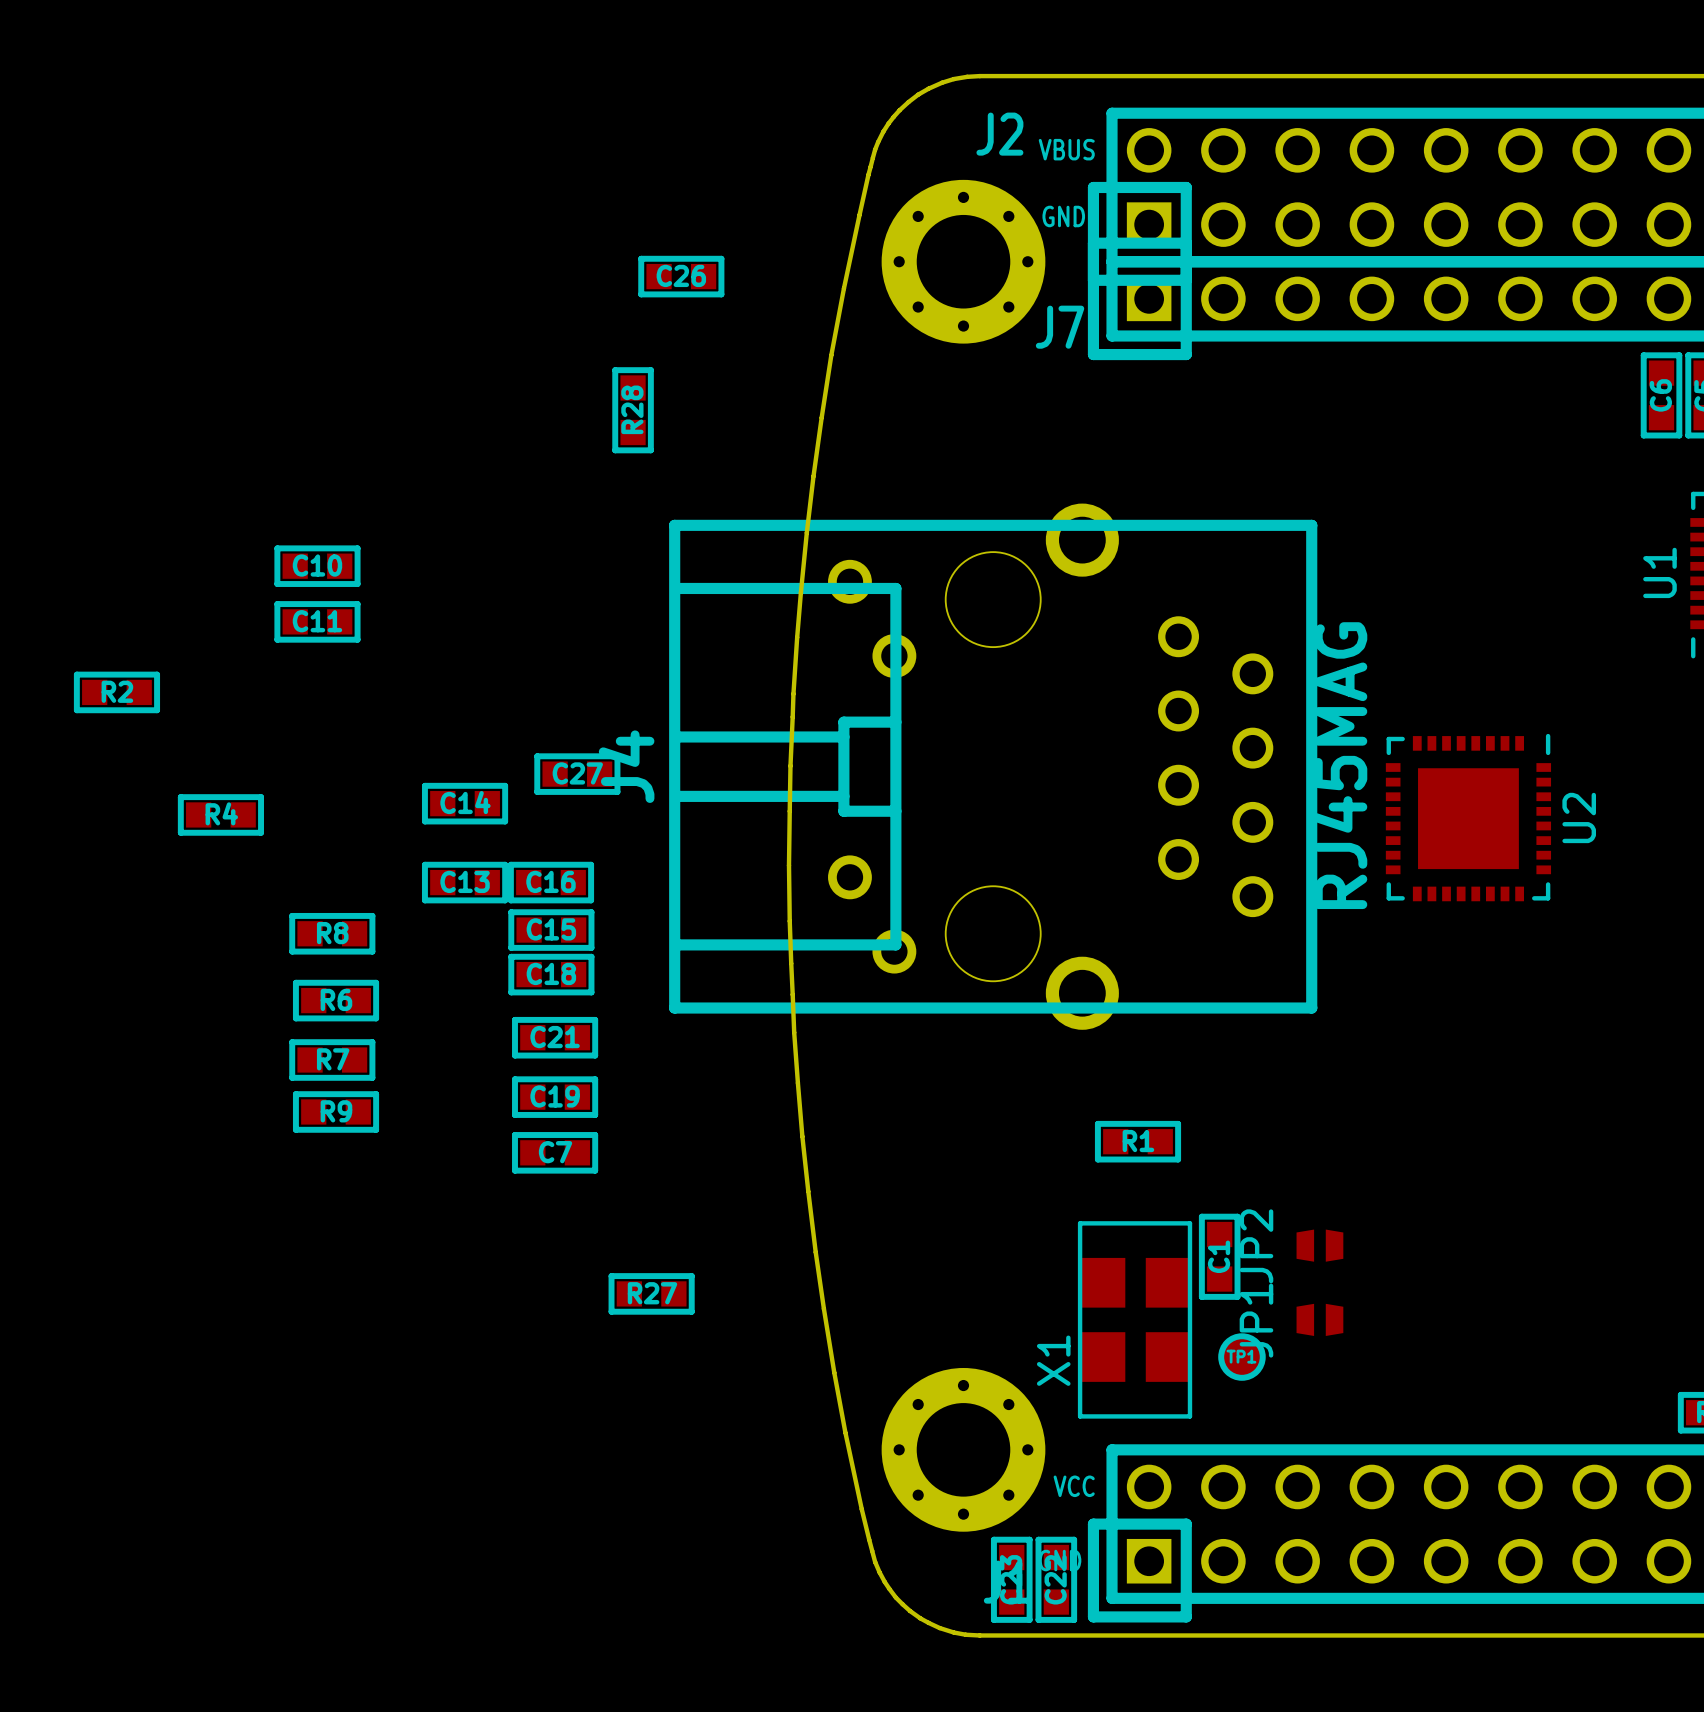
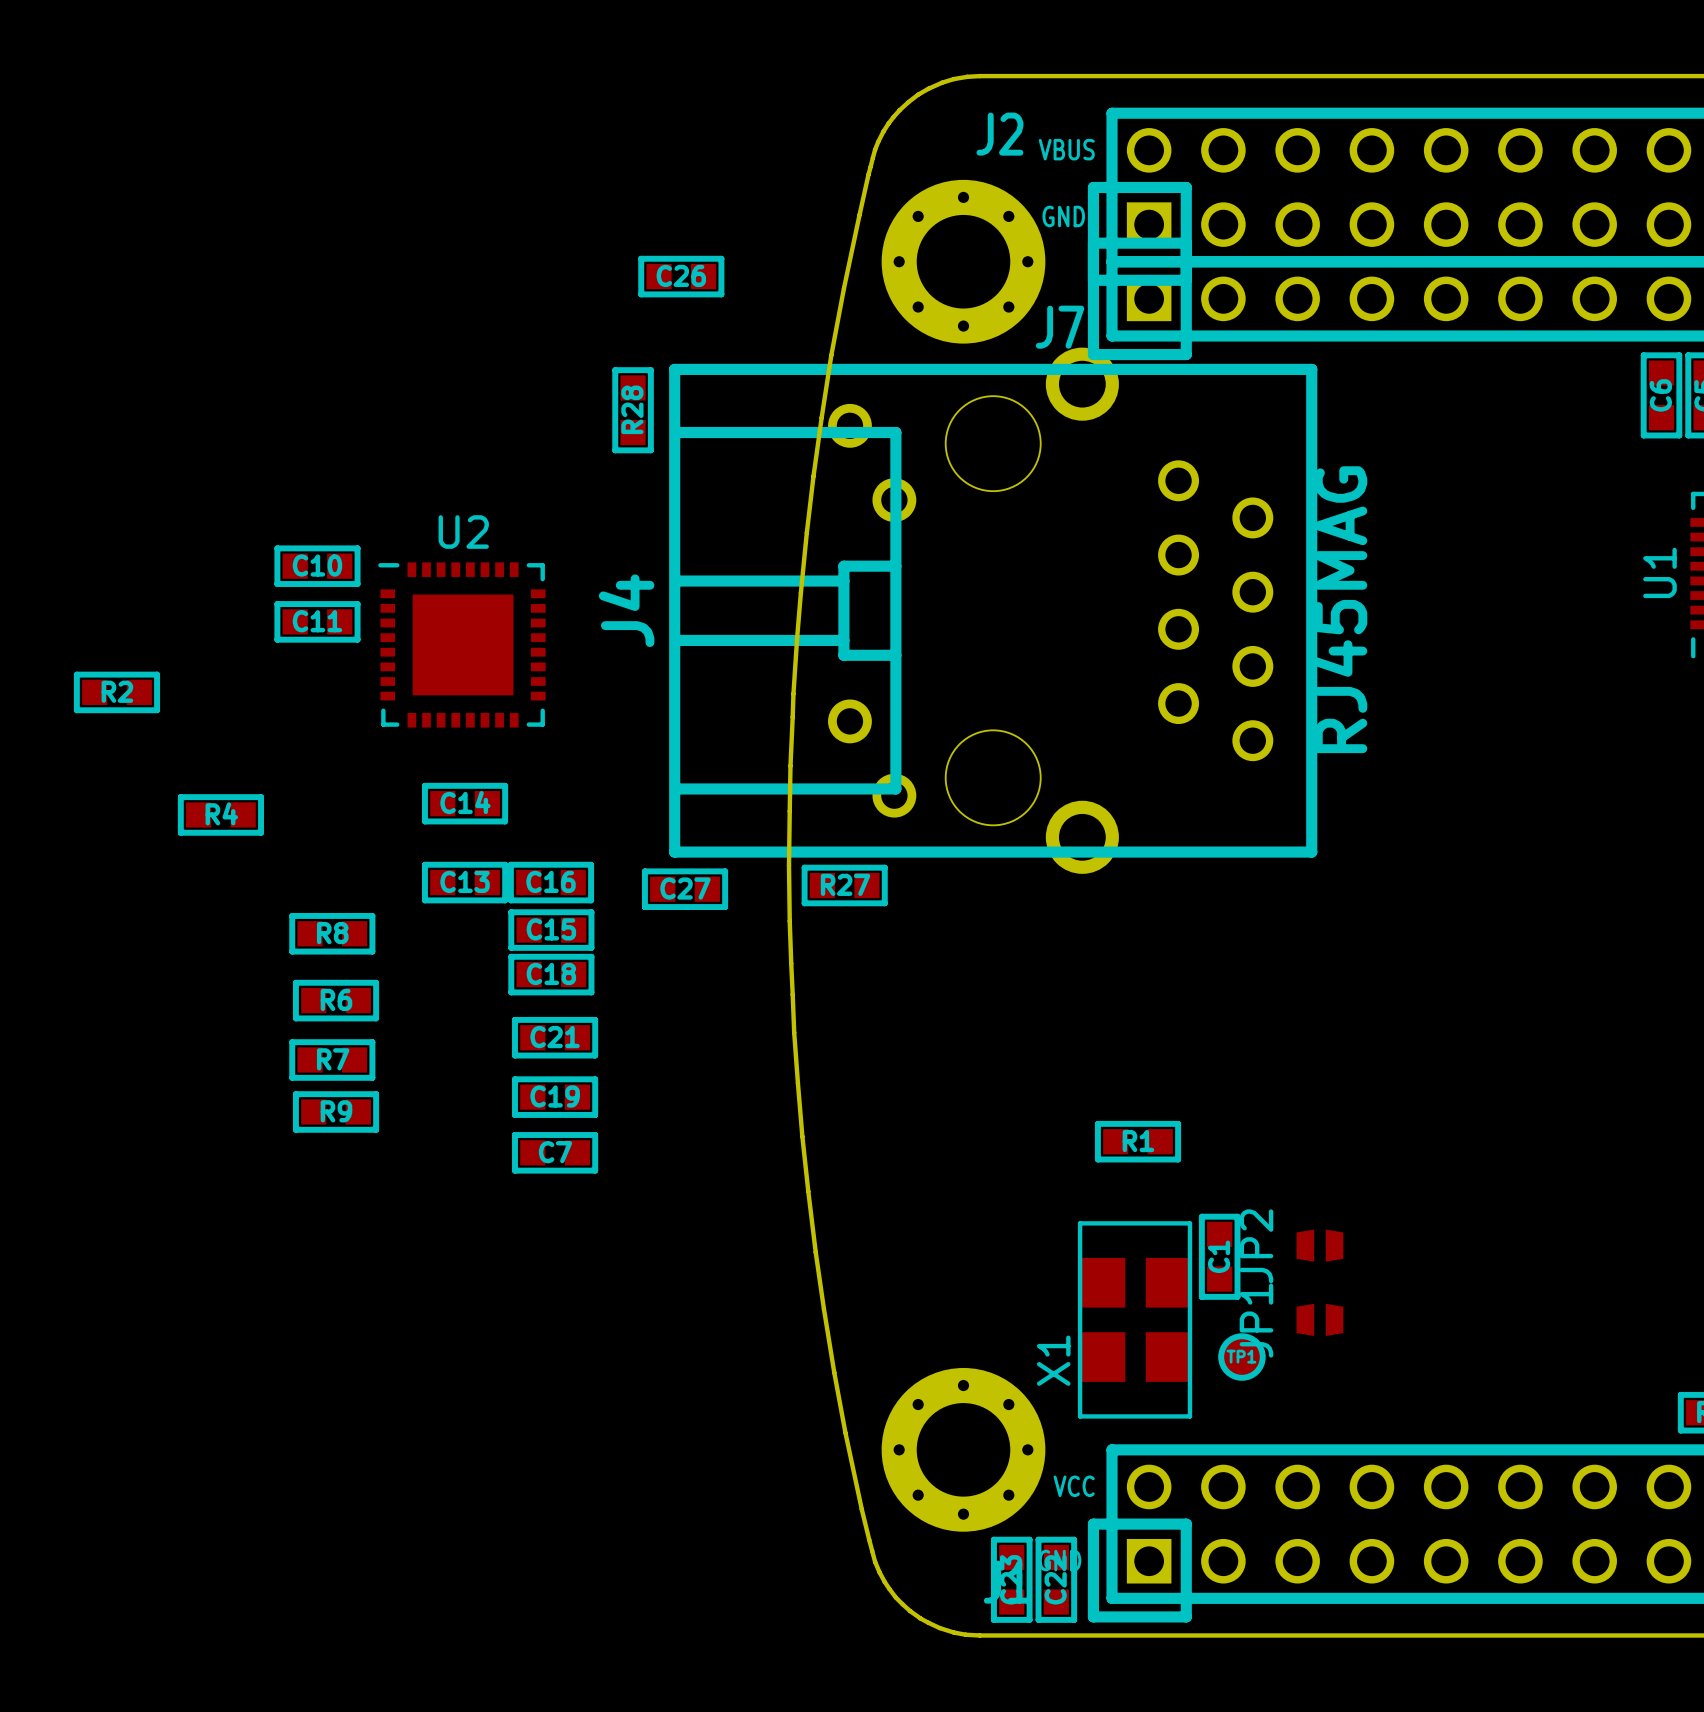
J4 position: (993, 766) -> (993, 610)
C27 position: (577, 774) -> (685, 889)
U2 rotation: 0° (1468, 817) -> 90° counterclockwise (461, 644)
U2 position: (1468, 817) -> (461, 644)
R27 position: (651, 1293) -> (844, 885)

